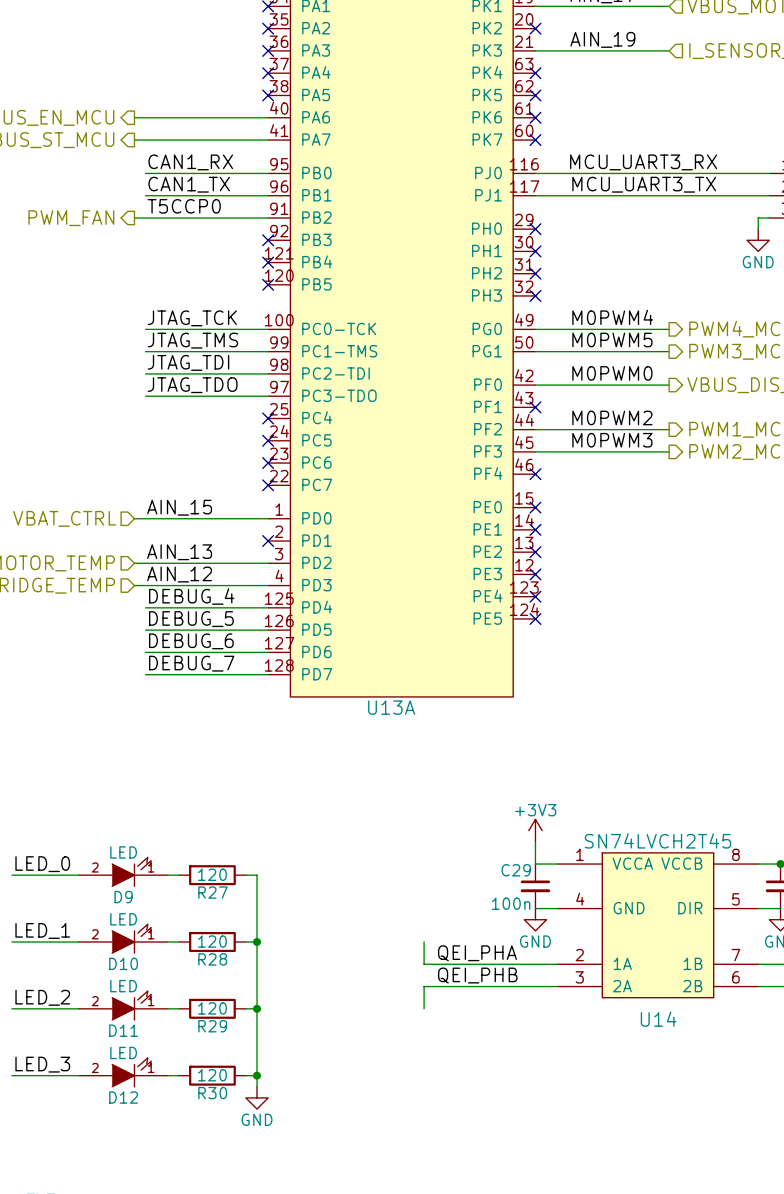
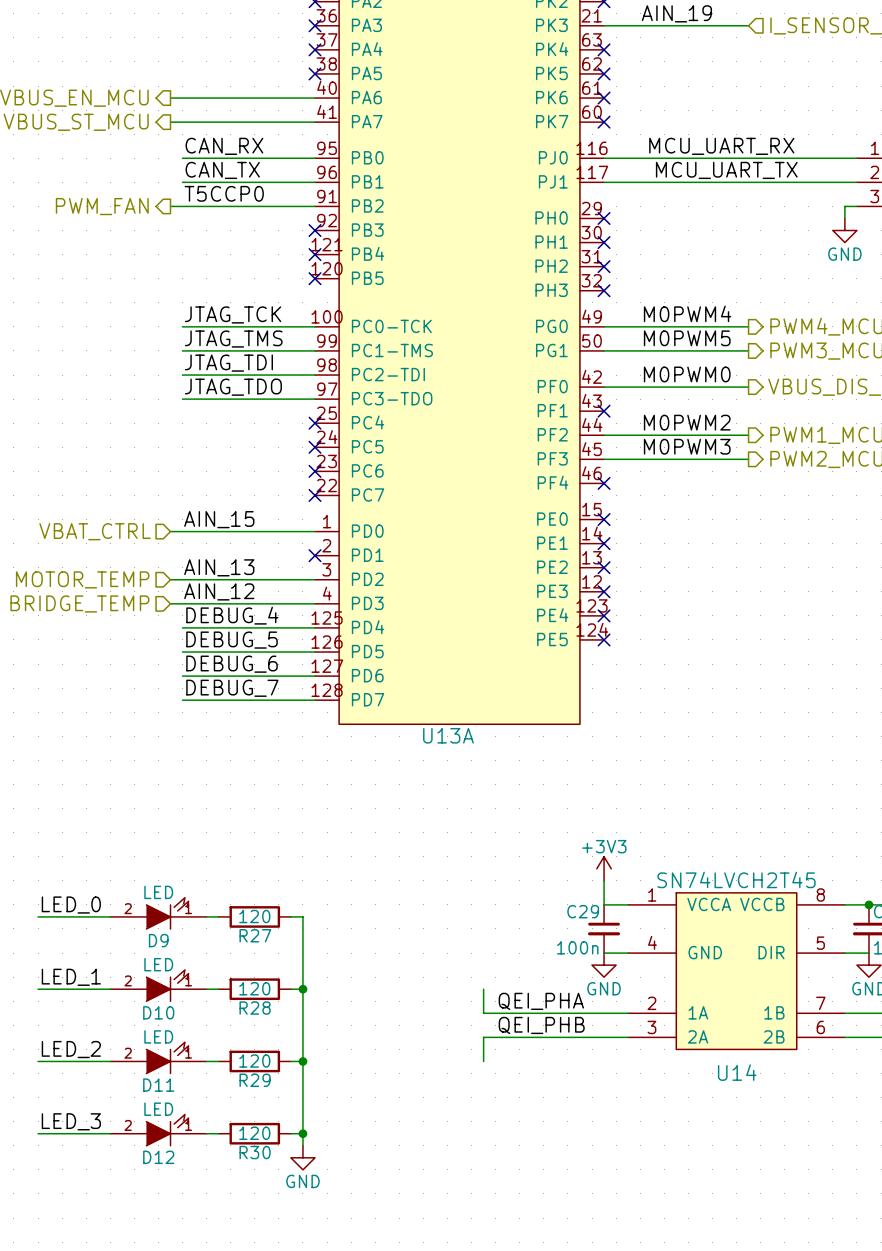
label: CAN1_RX (190, 162) -> CAN_RX (224, 146)
label: MCU_UART3_RX (643, 162) -> MCU_UART_RX (721, 146)
label: CAN1_TX (189, 184) -> CAN_TX (222, 170)
label: MCU_UART3_TX (644, 184) -> MCU_UART_TX (726, 170)

